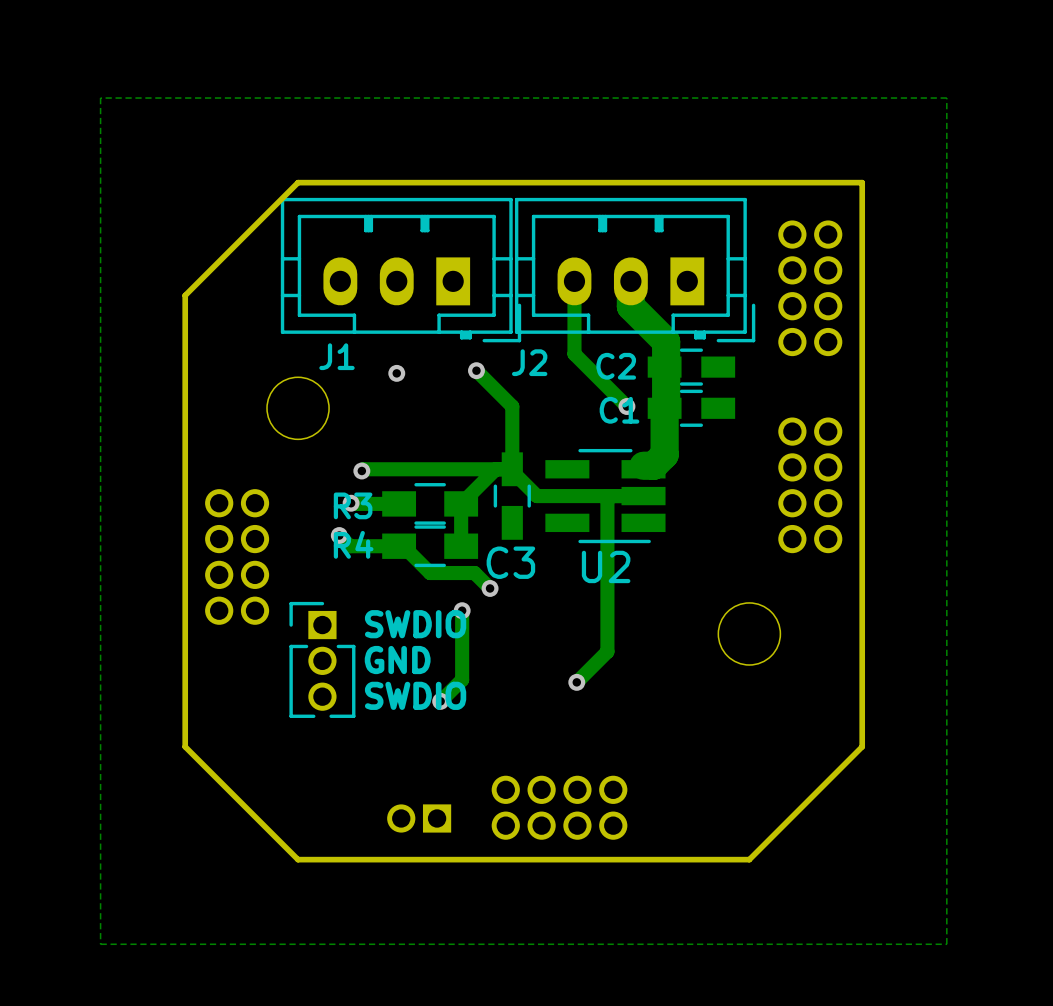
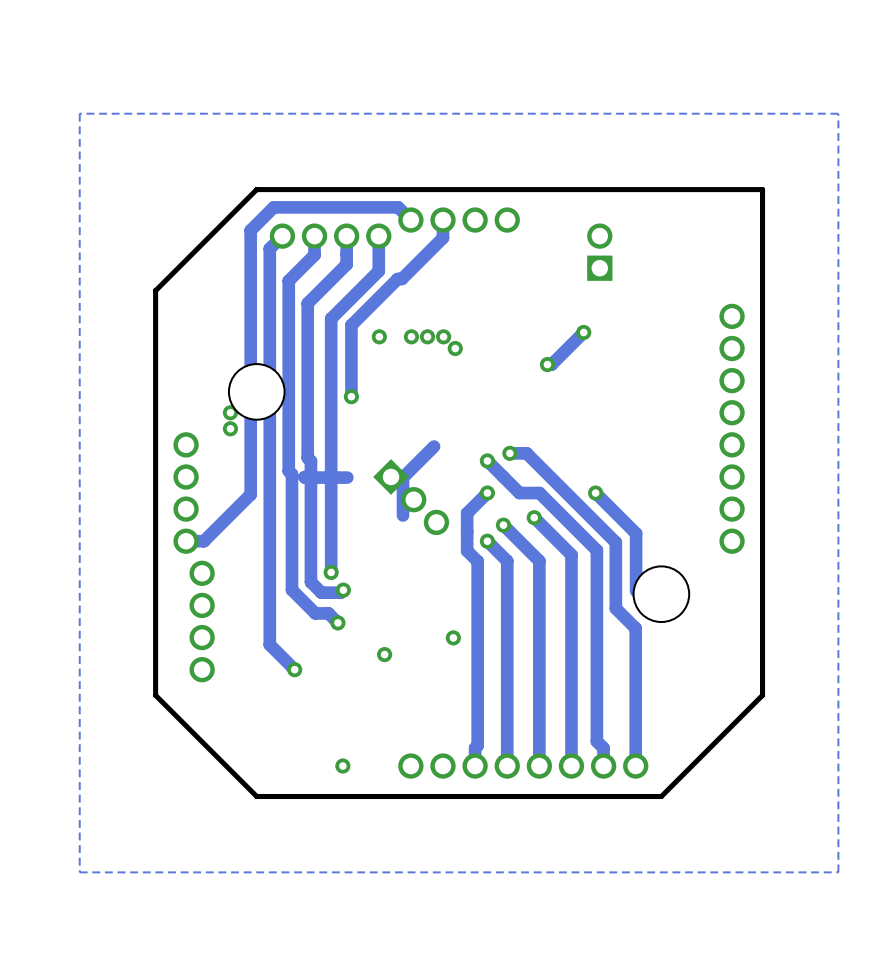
part footprint: [182, 179, 866, 863] -> [153, 187, 766, 800]
track: none -> (410, 220) (398, 207) (273, 207) (250, 230) (250, 494) (203, 541) (186, 541)
track: none -> (443, 220) (443, 237) (401, 278) (397, 278) (351, 325) (351, 396)
track: none -> (282, 236) (269, 248) (269, 644) (294, 669)
track: none -> (314, 236) (314, 255) (288, 280) (288, 471) (291, 474) (291, 590) (315, 613) (328, 613) (337, 622)
track: none -> (346, 236) (346, 264) (307, 303) (307, 457) (310, 461) (310, 582) (321, 592) (340, 592) (343, 590)
track: none -> (378, 236) (378, 271) (331, 318) (331, 572)
J1: (400, 270) -> none
J2: (635, 270) -> none
track: (574, 281) (574, 354) (626, 406) -> none
track: (630, 281) (630, 306) (666, 341) (666, 406) -> none
track: none -> (583, 332) (551, 364) (547, 364)
via: none -> (583, 332)
via: none -> (379, 336)
via: none -> (411, 336)
via: none -> (427, 336)
via: none -> (443, 336)
via: none -> (455, 348)
C2: (691, 367) -> none
track: (476, 370) (512, 406) (512, 471) (536, 496) (643, 496) -> none
via: (476, 370) -> none
via: (396, 373) -> none
via position: (626, 406) -> (547, 364)
track: (664, 408) (664, 454) (653, 465) (643, 465) -> none
C1: (691, 408) -> none
via: none -> (351, 396)
via: none -> (230, 412)
via: none -> (230, 428)
track: (512, 469) (363, 469) (361, 470) -> none
via: (361, 470) -> none
track: none -> (509, 453) (526, 453) (615, 542) (615, 608) (635, 628) (635, 766)
via: none -> (509, 453)
track: none -> (487, 460) (519, 493) (539, 493) (596, 550) (596, 741) (603, 748) (603, 766)
via: none -> (487, 460)
C3: (512, 496) -> none
U2: (605, 496) -> none
track: (607, 496) (607, 651) (576, 682) -> none
via: (351, 503) -> none
R3: (430, 503) -> none
track: none -> (487, 493) (467, 513) (467, 550) (477, 561) (477, 745) (475, 748) (475, 766)
via: none -> (487, 493)
track: none -> (595, 493) (636, 533) (636, 591)
via: none -> (595, 493)
track: (339, 535) (350, 546) (403, 546) (430, 573) (474, 573) (490, 588) -> none
via: (339, 535) -> none
R4: (430, 546) -> none
track: none -> (534, 517) (571, 554) (571, 766)
via: none -> (534, 517)
track: none -> (503, 525) (539, 561) (539, 766)
via: none -> (503, 525)
track: none -> (487, 541) (507, 561) (507, 766)
via: none -> (487, 541)
via: (490, 588) -> none
via: none -> (331, 572)
track: (462, 610) (462, 679) (440, 701) -> none
via: (462, 610) -> none
text: SWDIO (415, 624) -> none
via: none -> (343, 590)
part side: bottom (322, 659) -> top (411, 497)
text: GND (397, 660) -> none
via: none -> (337, 622)
via: none -> (453, 637)
via: (576, 682) -> none
text: SWDIO (415, 695) -> none
via: none -> (294, 669)
part rotation: 0° (419, 818) -> 90° clockwise (599, 252)
part position: (419, 818) -> (599, 252)
via: none -> (342, 766)

